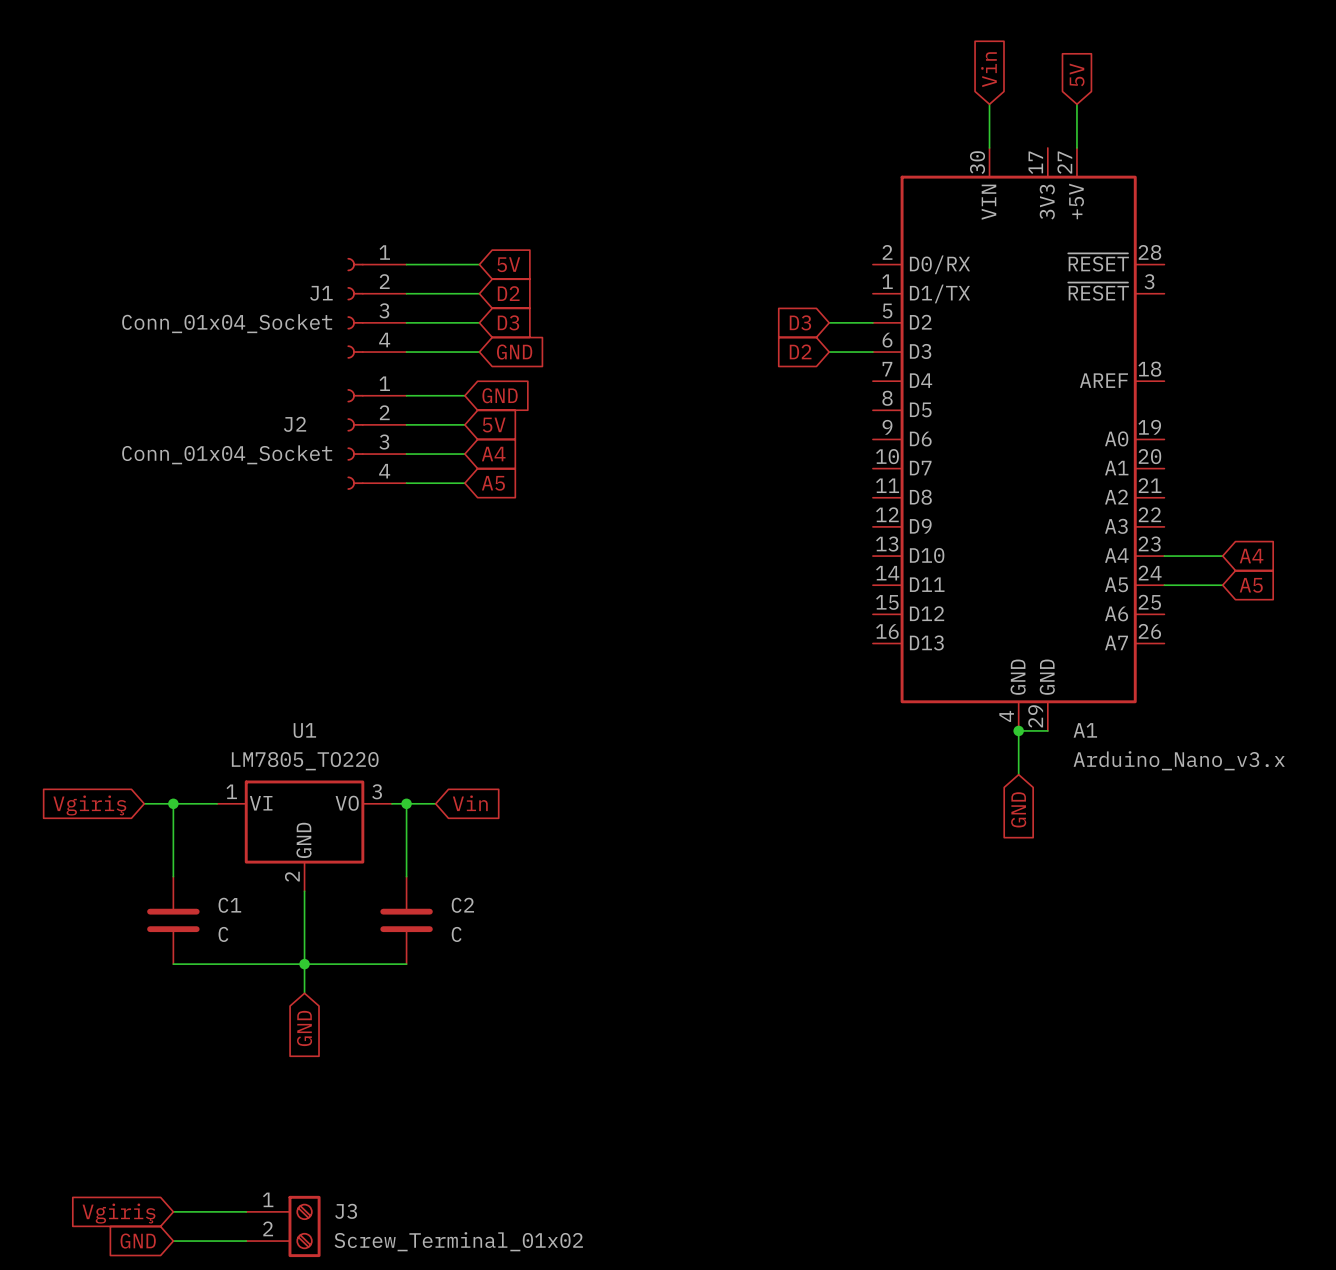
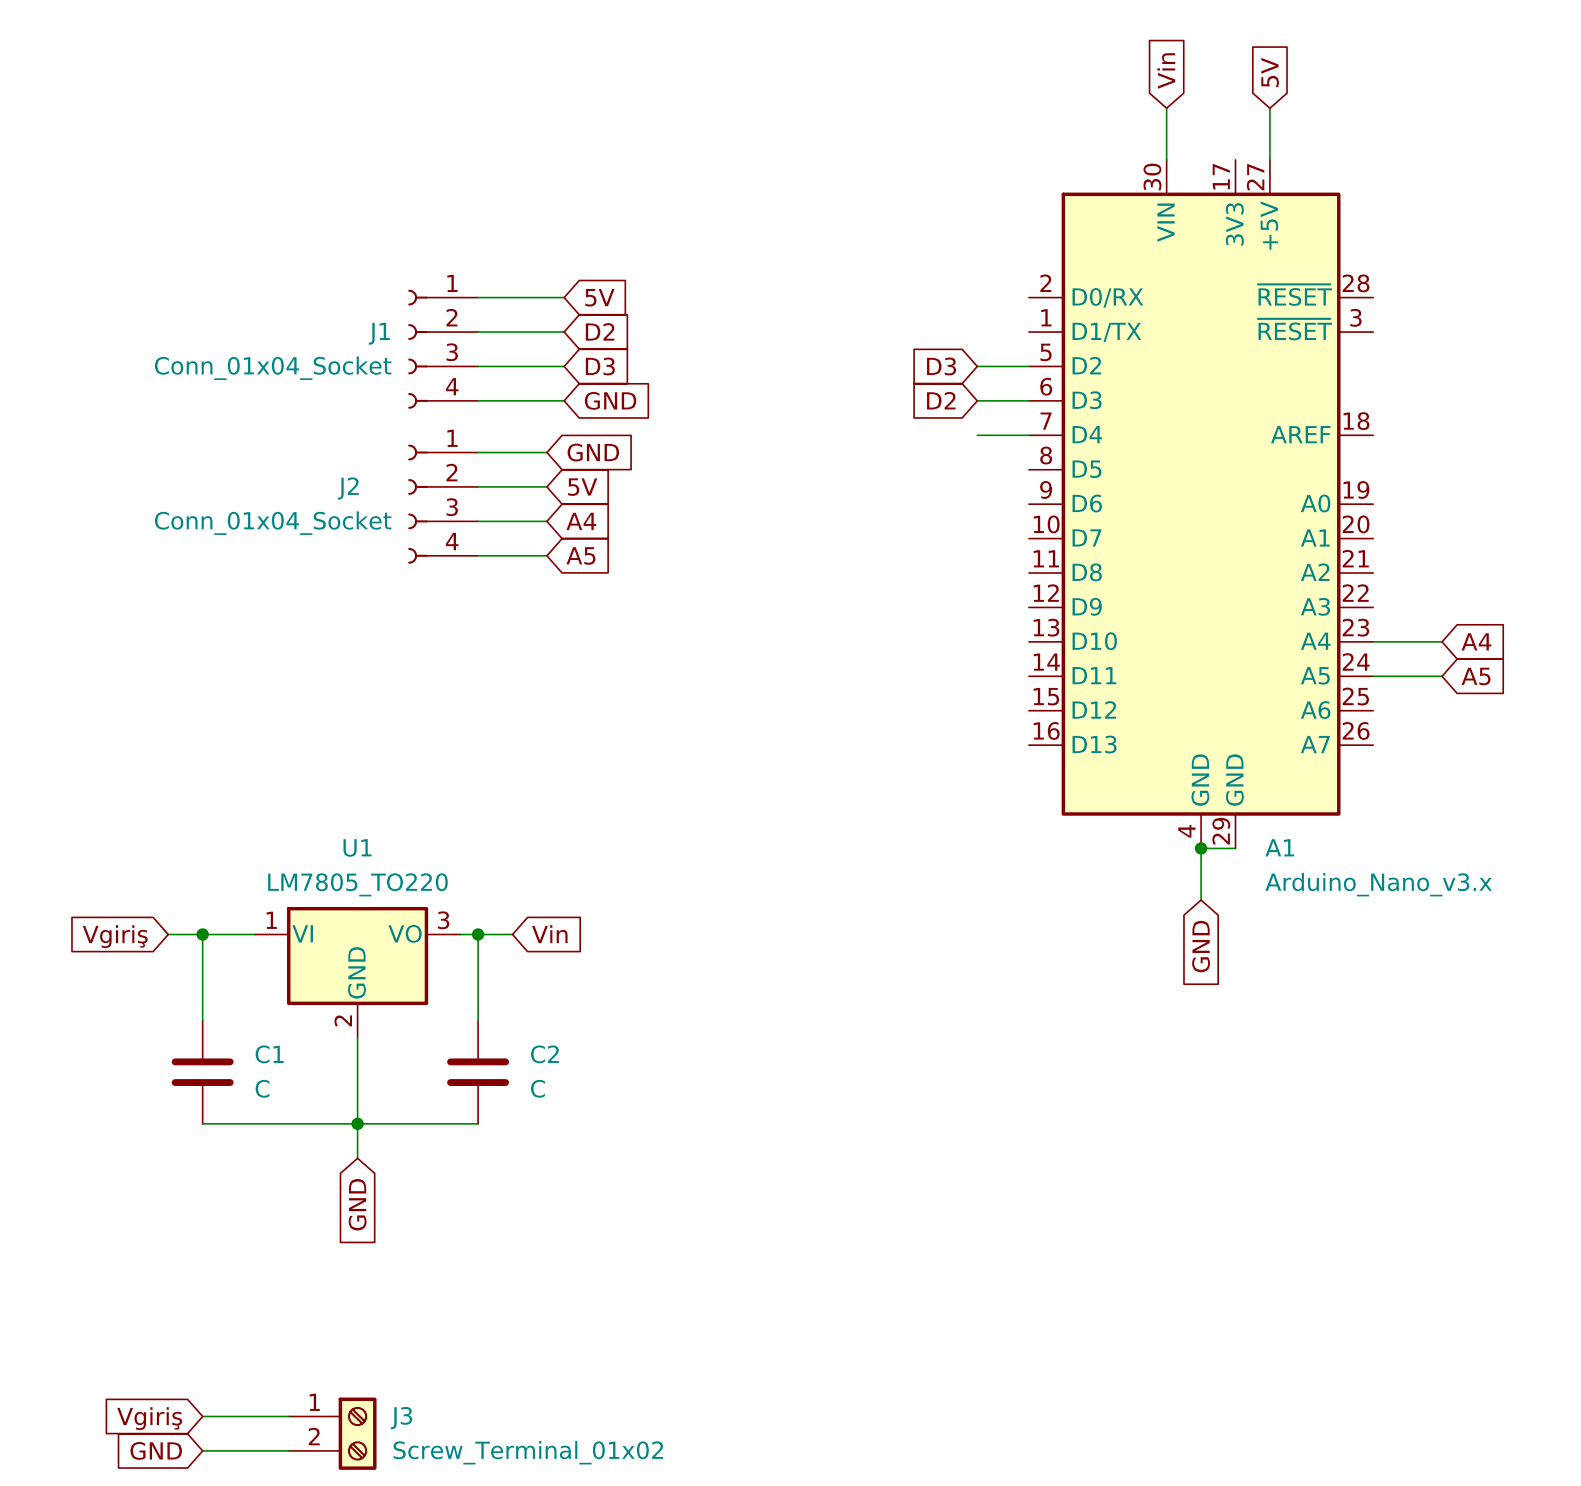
wire: none -> (977, 435) (1028, 435)

